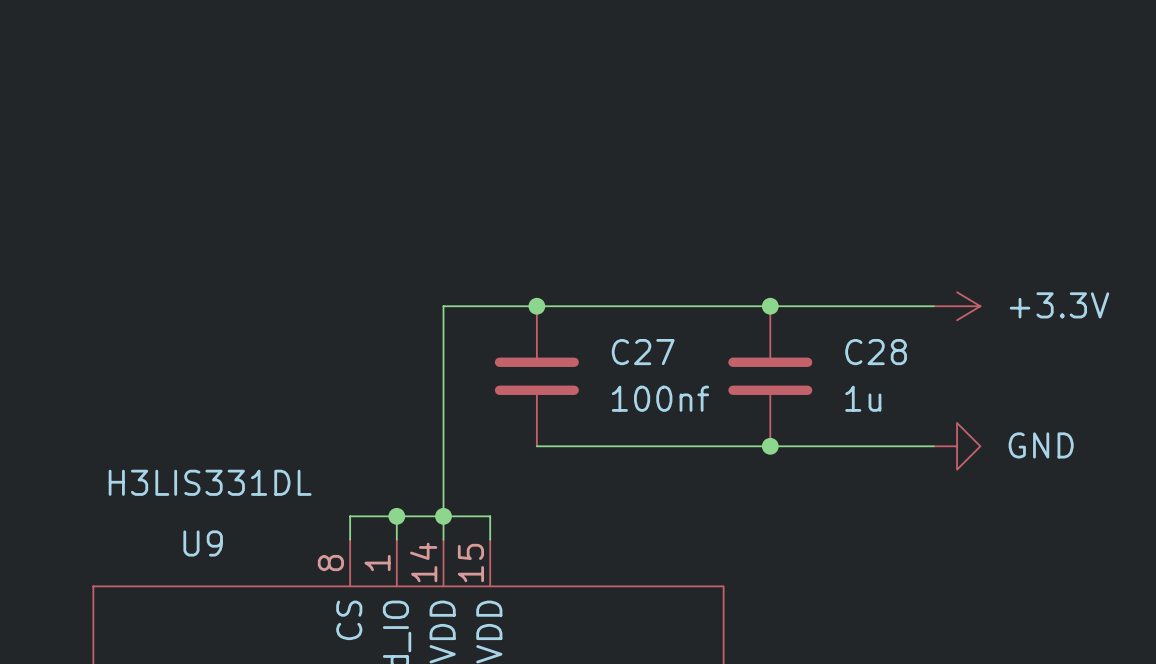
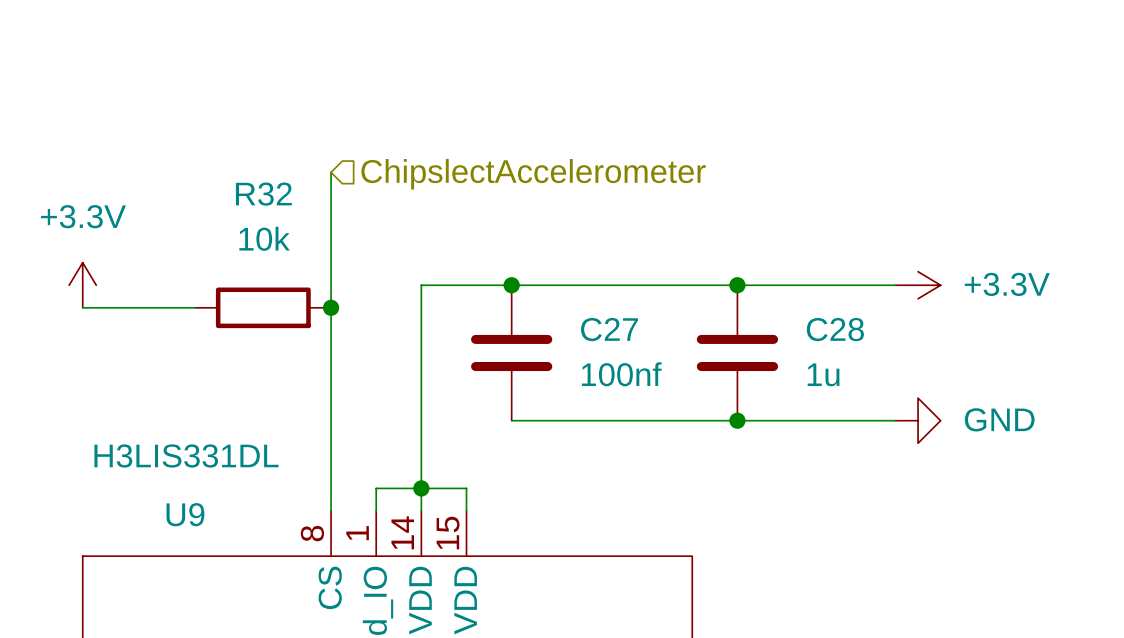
hierarchical label: none -> ChipslectAccelerometer (533, 174)
power symbol: none -> +3.3V (82, 285)
wire: none -> (82, 307) (195, 307)
R32: none -> 10k (263, 307)
junction: none -> (331, 307)
wire: (350, 516) (396, 516) -> (331, 488) (331, 172)
junction: (396, 516) -> none

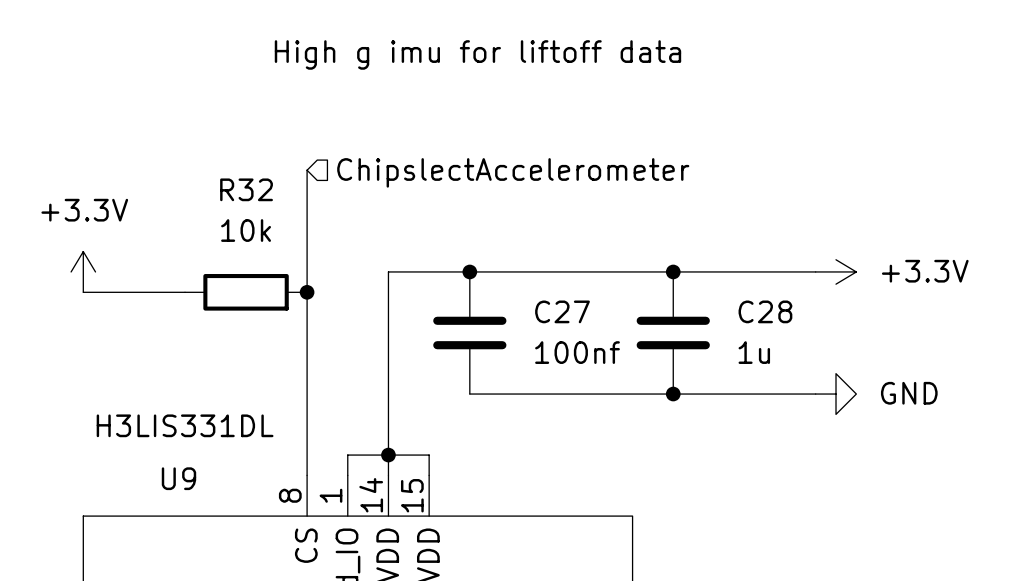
text: none -> High g imu for liftoff data (477, 54)

